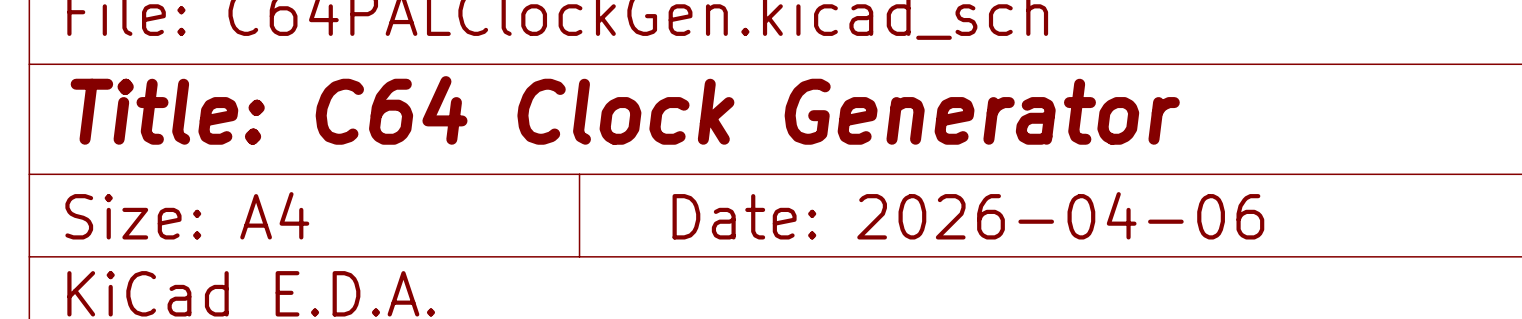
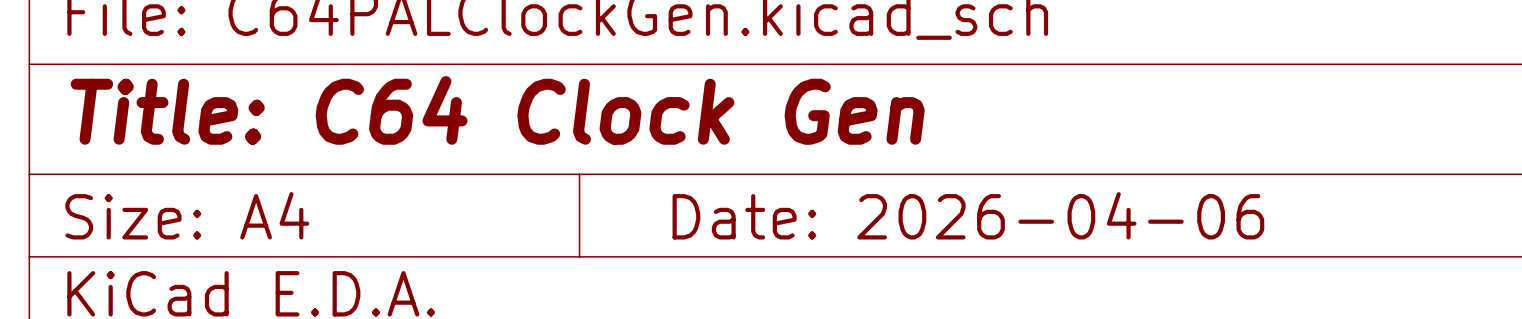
title block: Title: C64 Clock Generator (625, 110) -> Title: C64 Clock Gen (497, 110)

